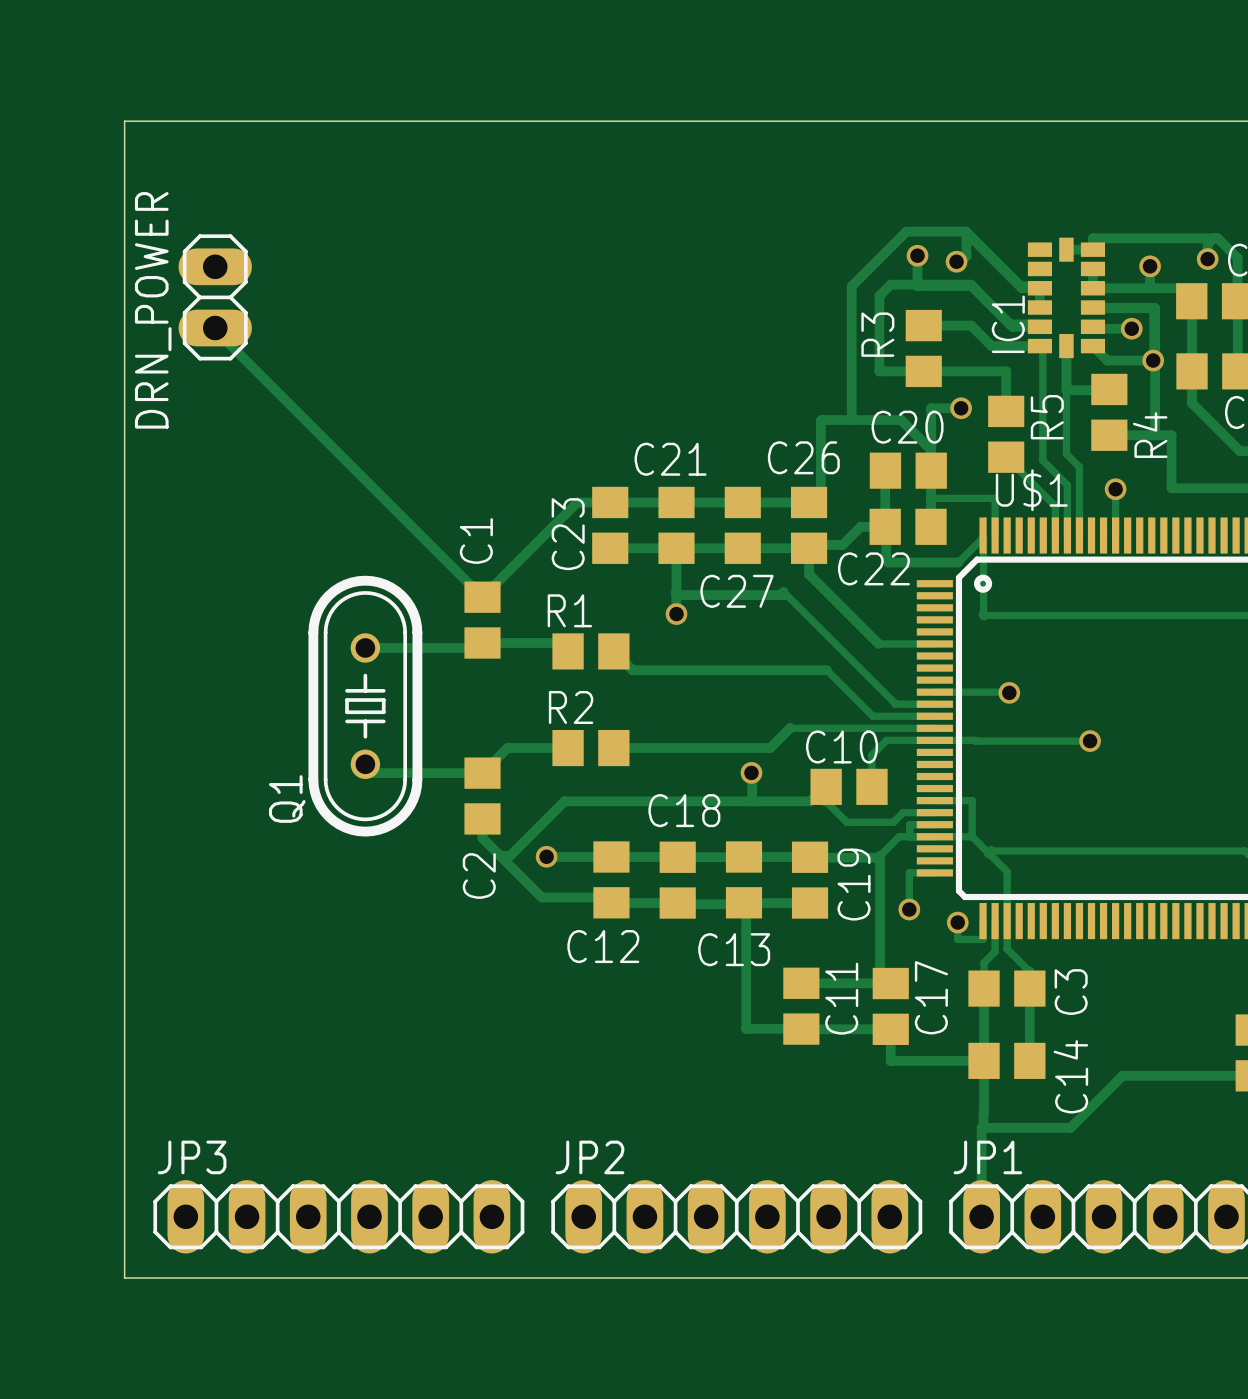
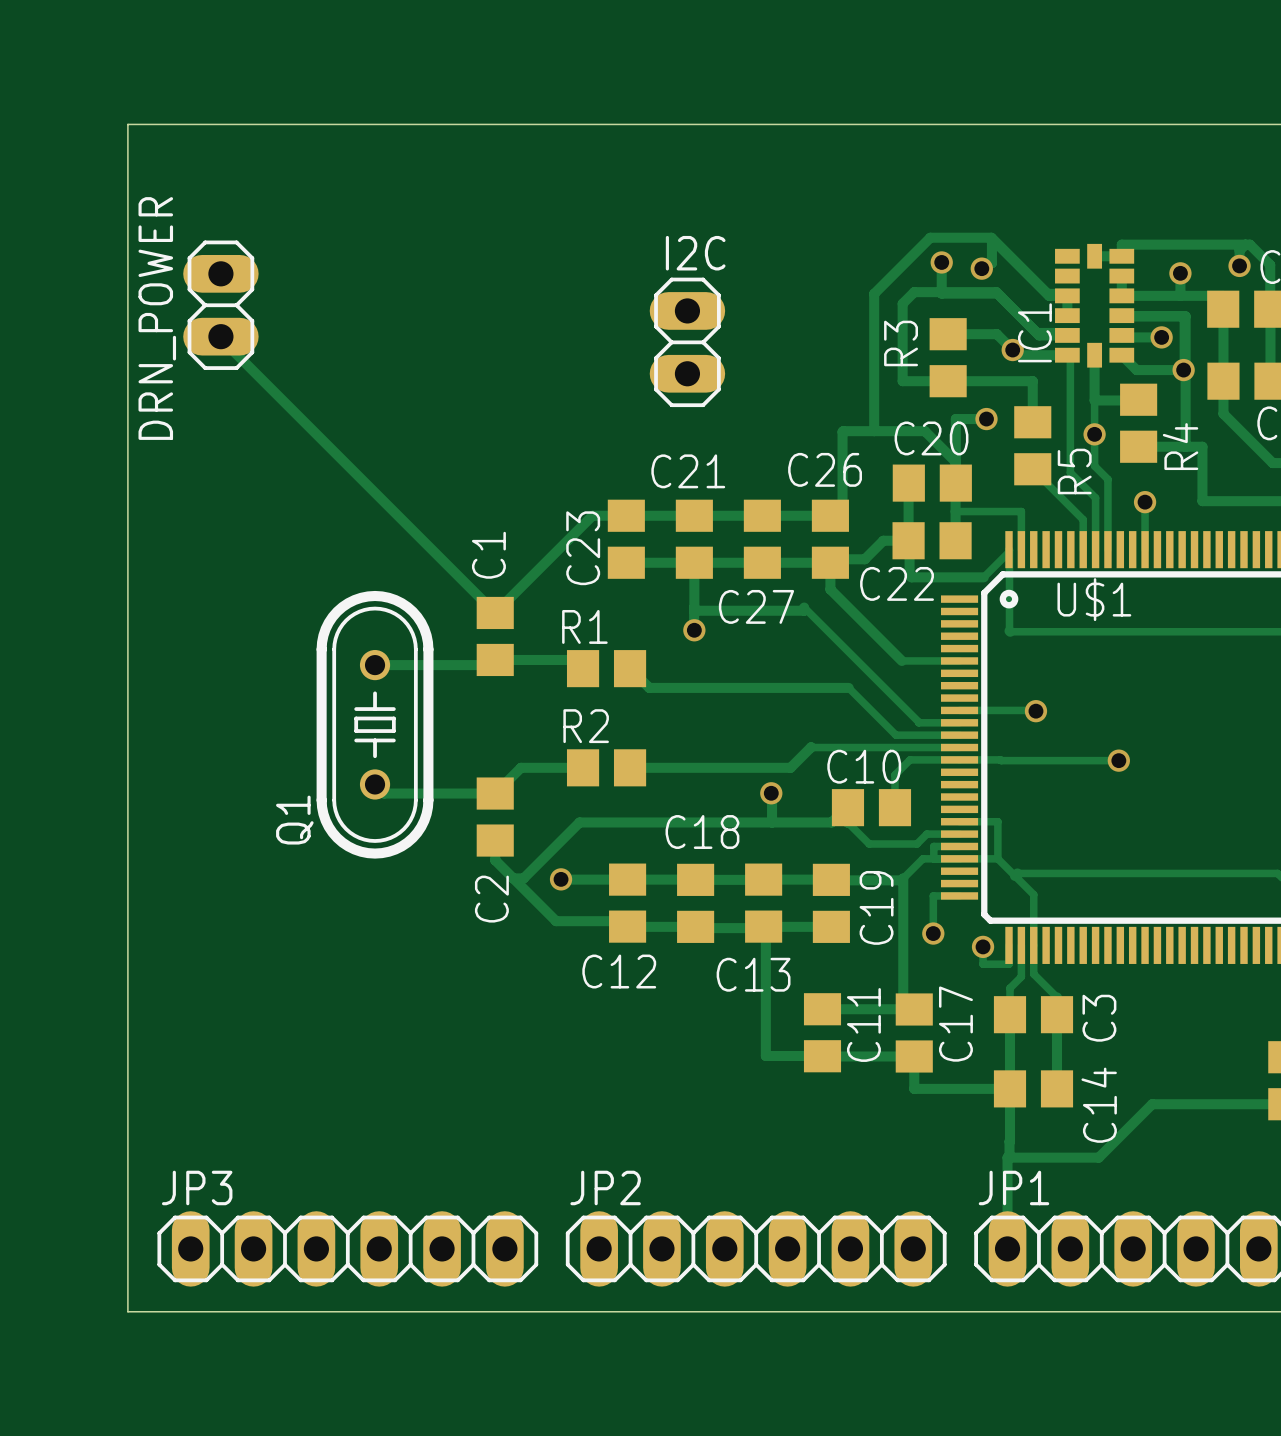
I2C: none -> (687, 342)
via: none -> (1012, 350)
R5 name position: R5 (1047, 417) -> R5 (1074, 471)
via: none -> (1094, 434)
U$1 name position: U$1 (1031, 490) -> U$1 (1094, 599)

